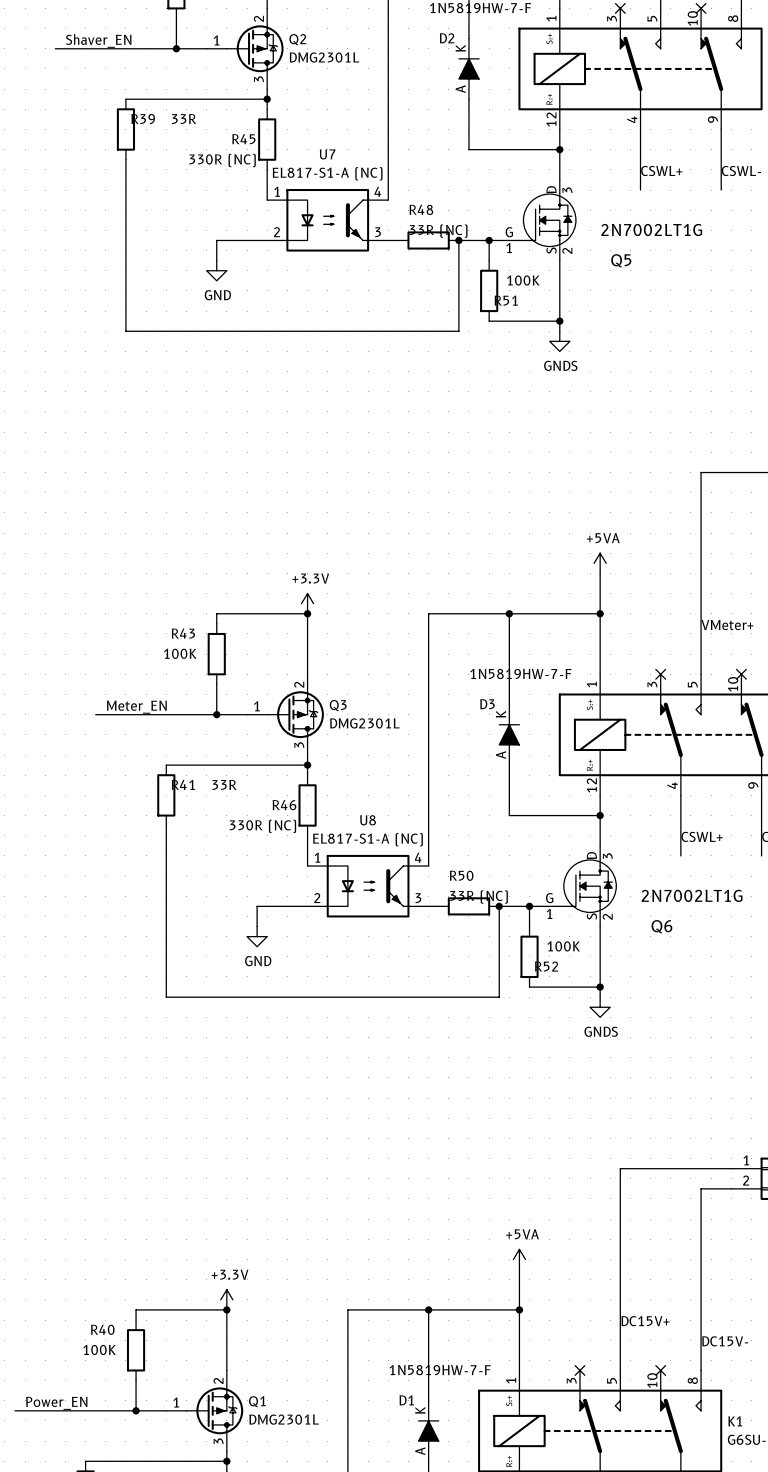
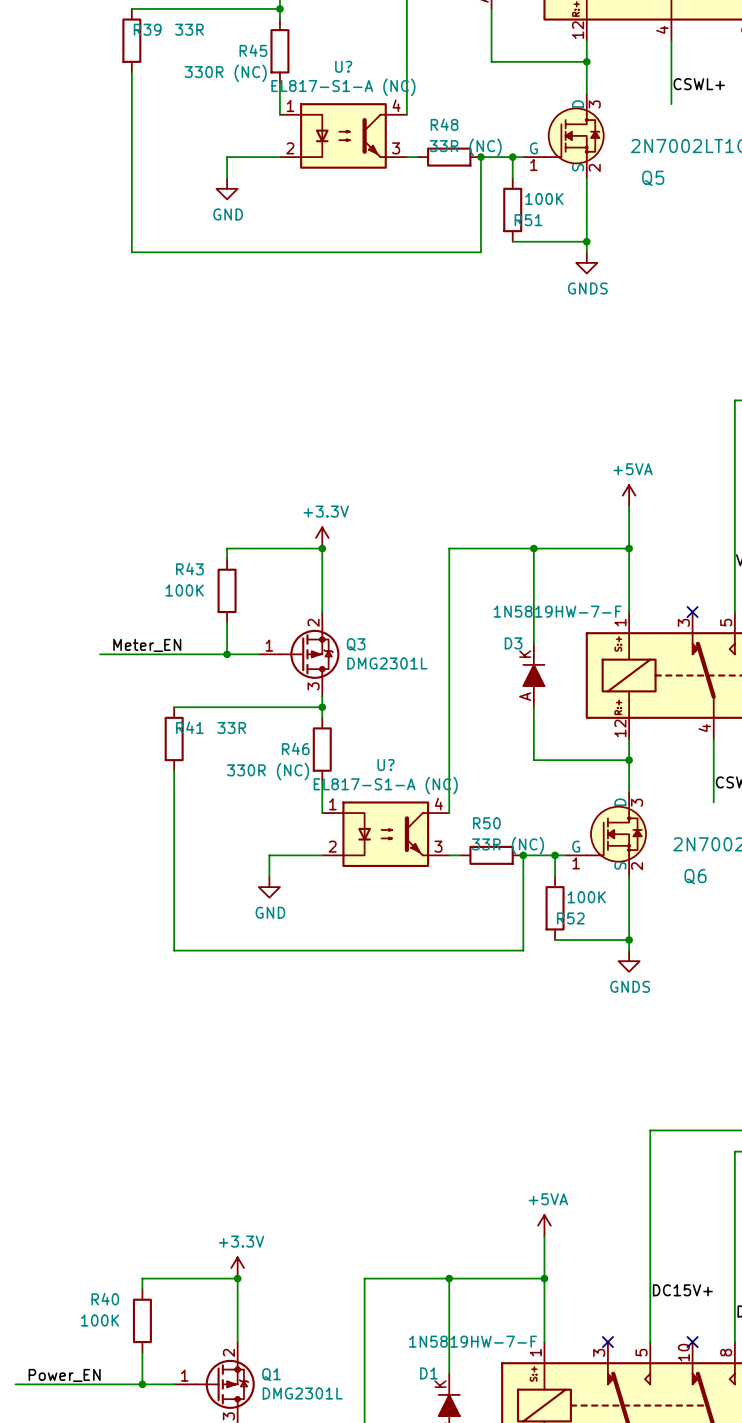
U7 name: U7 (327, 154) -> U? (343, 66)
U8 name: U8 (368, 820) -> U? (386, 765)

